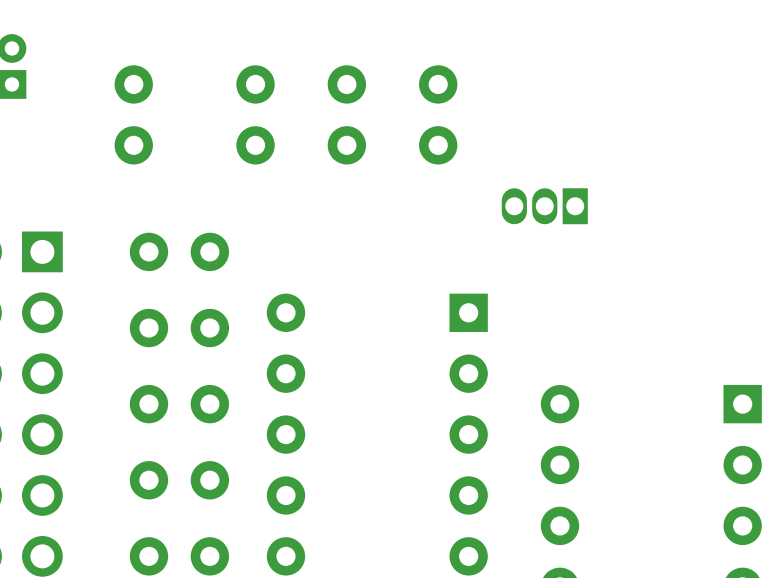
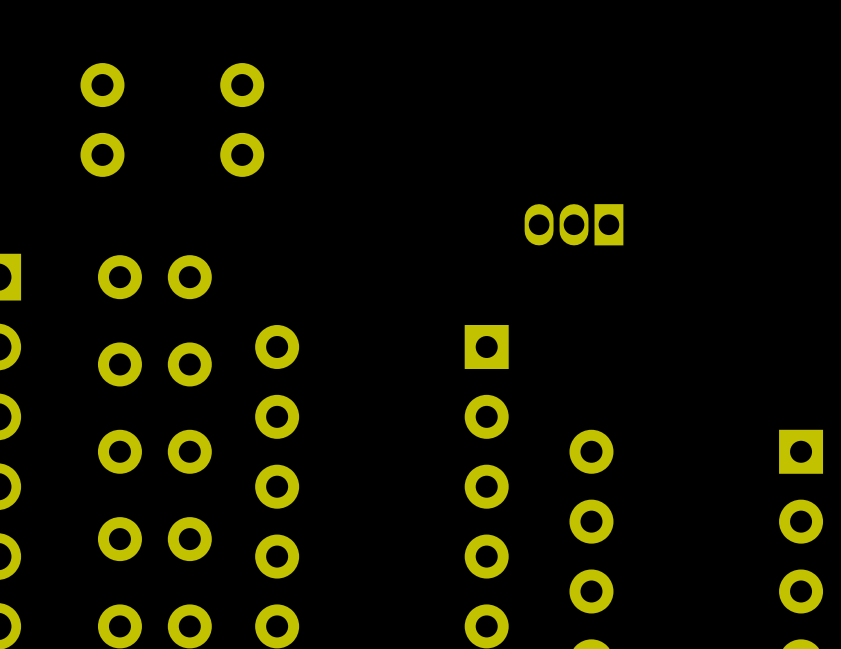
part: (346, 114) -> none
part: (438, 114) -> none

